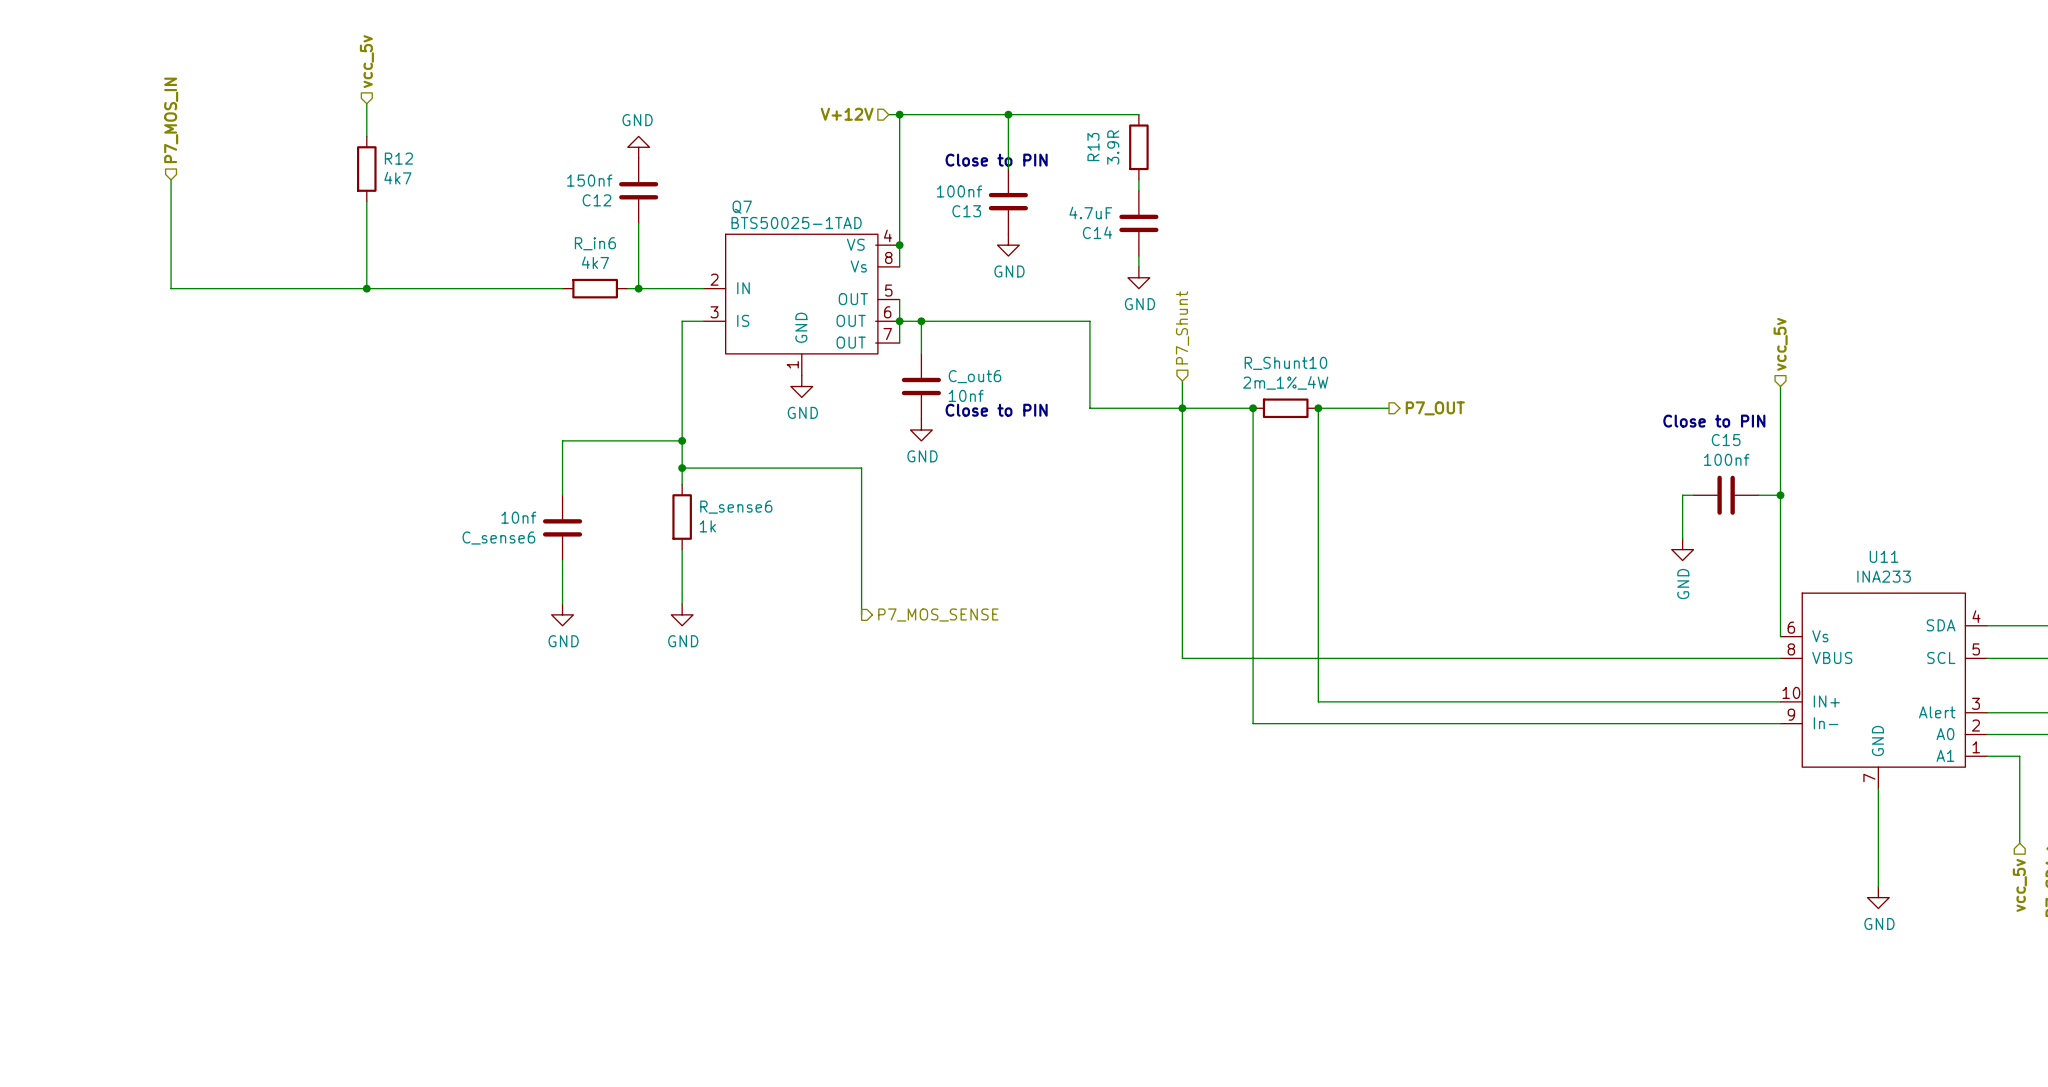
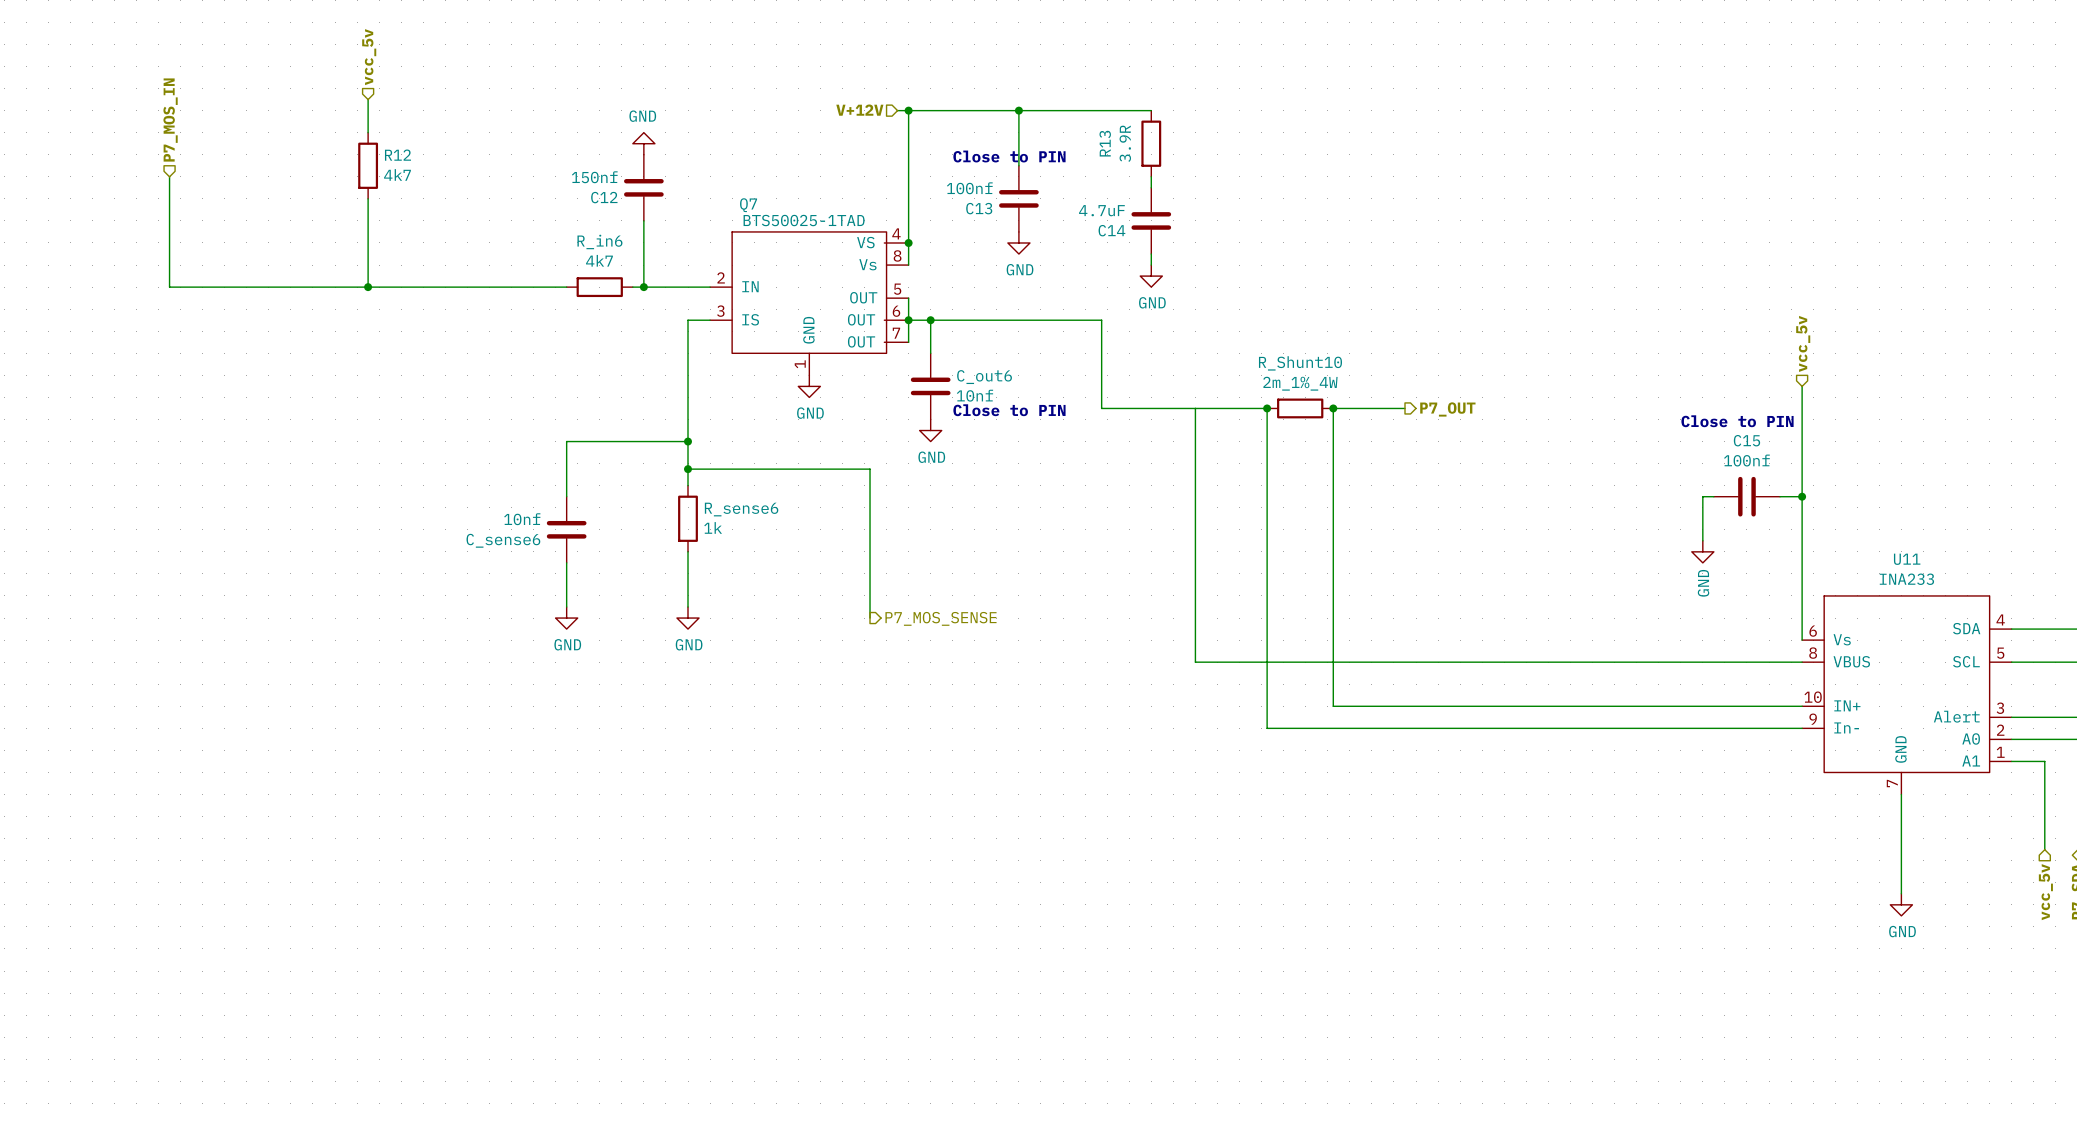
hierarchical label: P7_Shunt (1182, 327) -> none
wire: (1182, 381) (1182, 408) -> none
junction: (1182, 408) -> none

